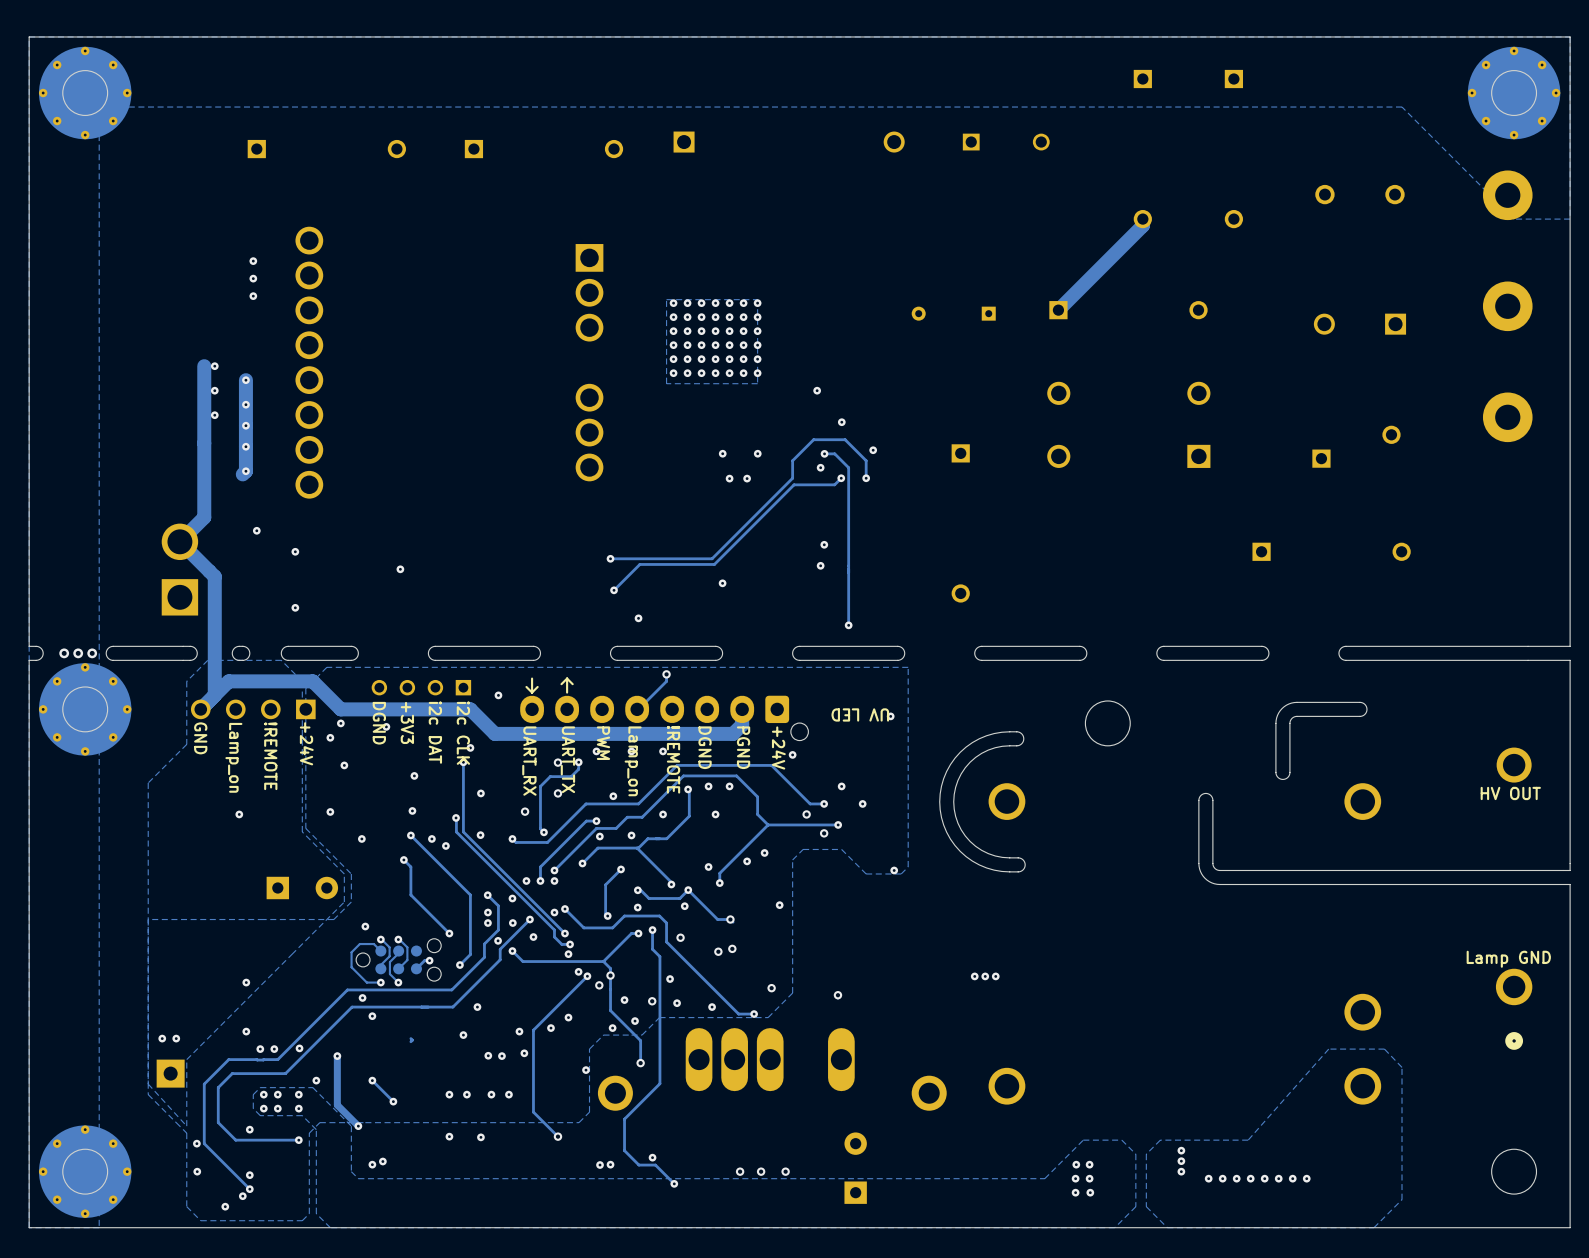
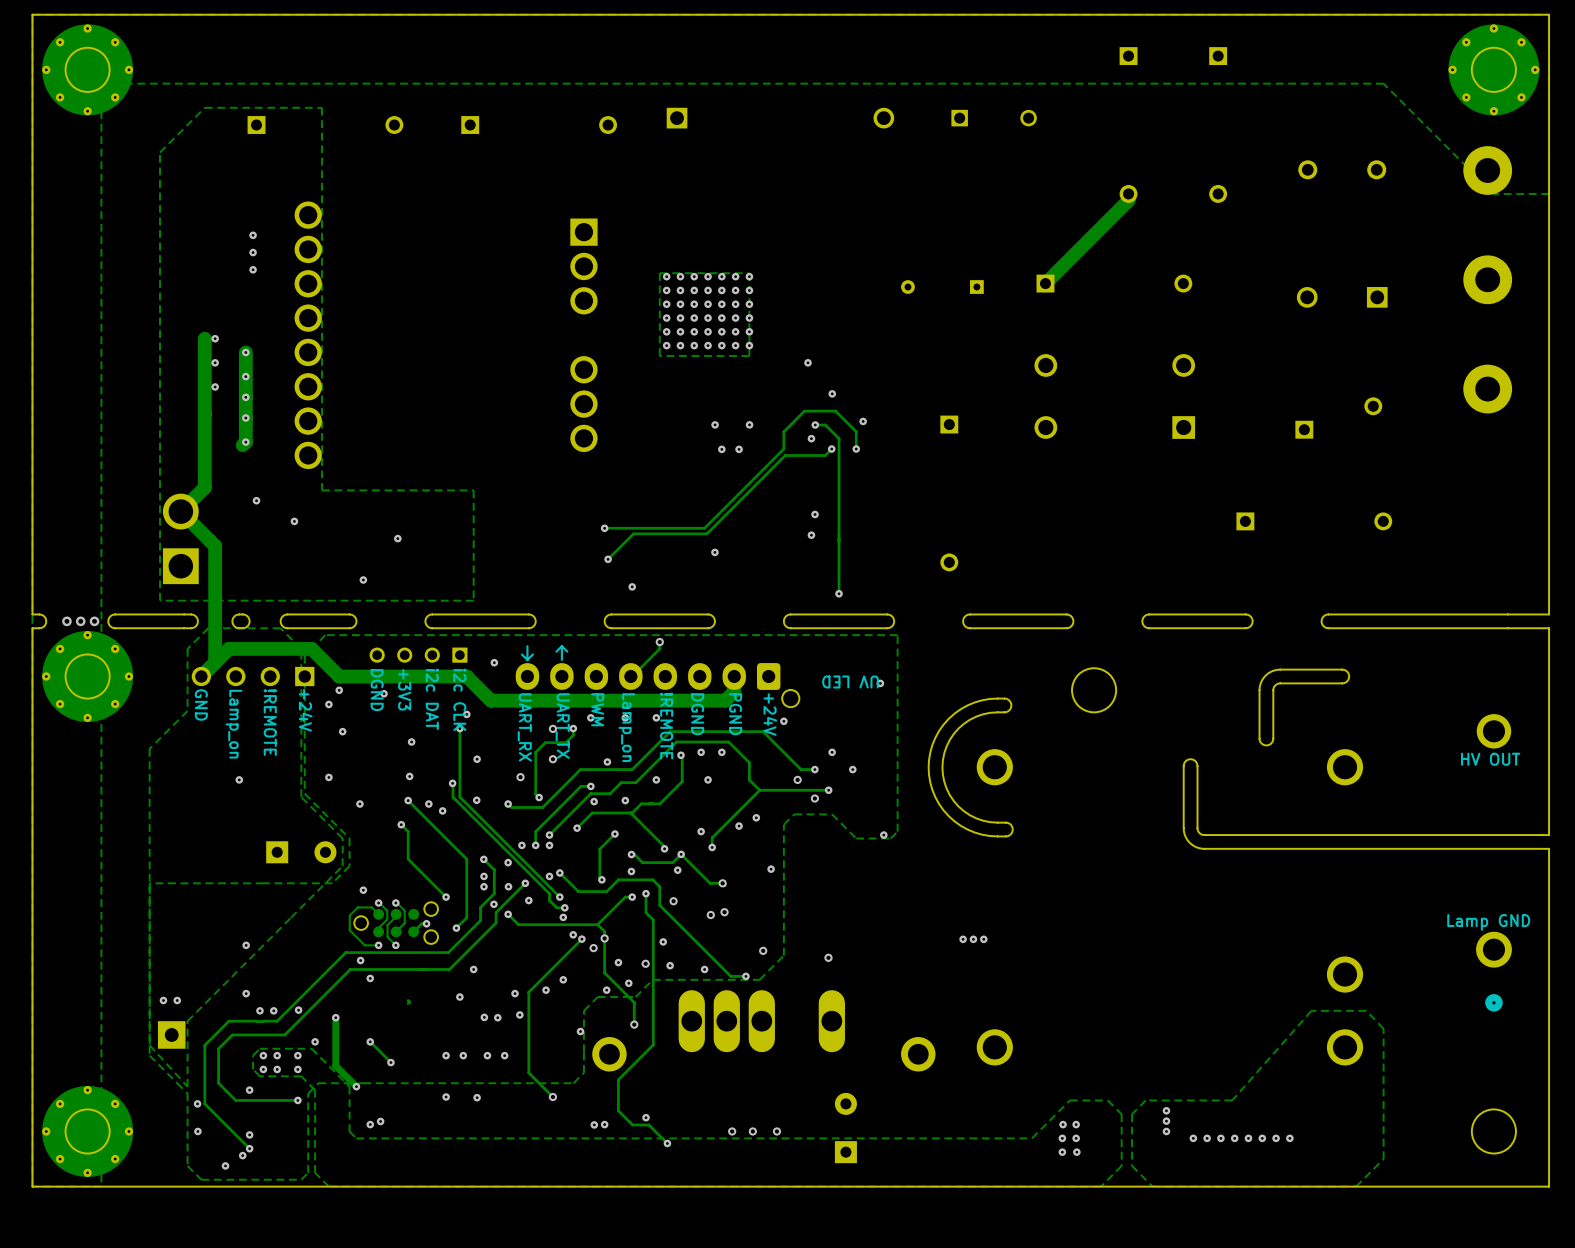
zone outline: none -> (322, 107) (322, 490) (473, 490) (473, 600) (160, 600) (160, 152) (204, 107) (322, 107)
via position: (295, 607) -> (363, 579)

